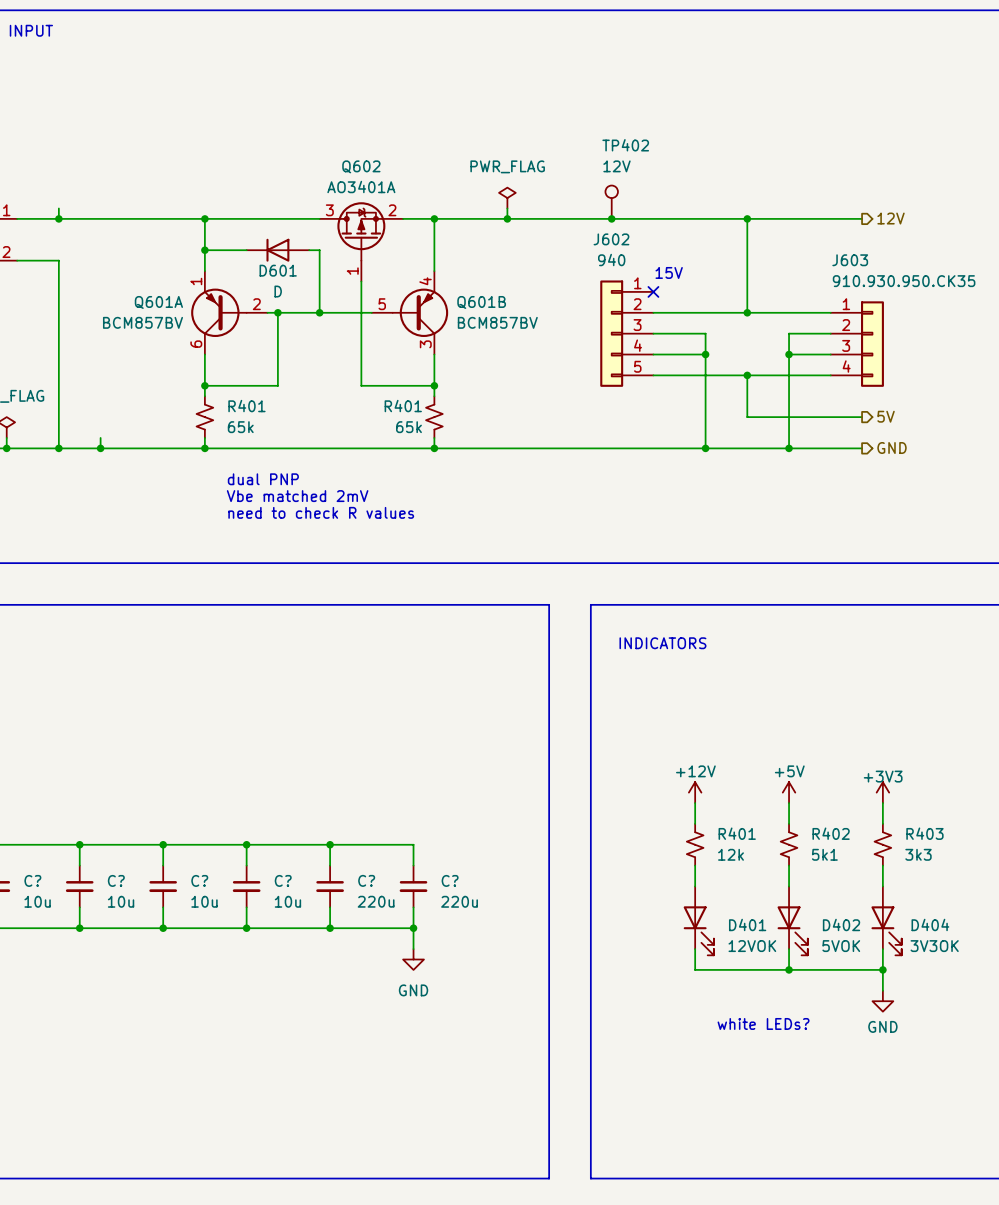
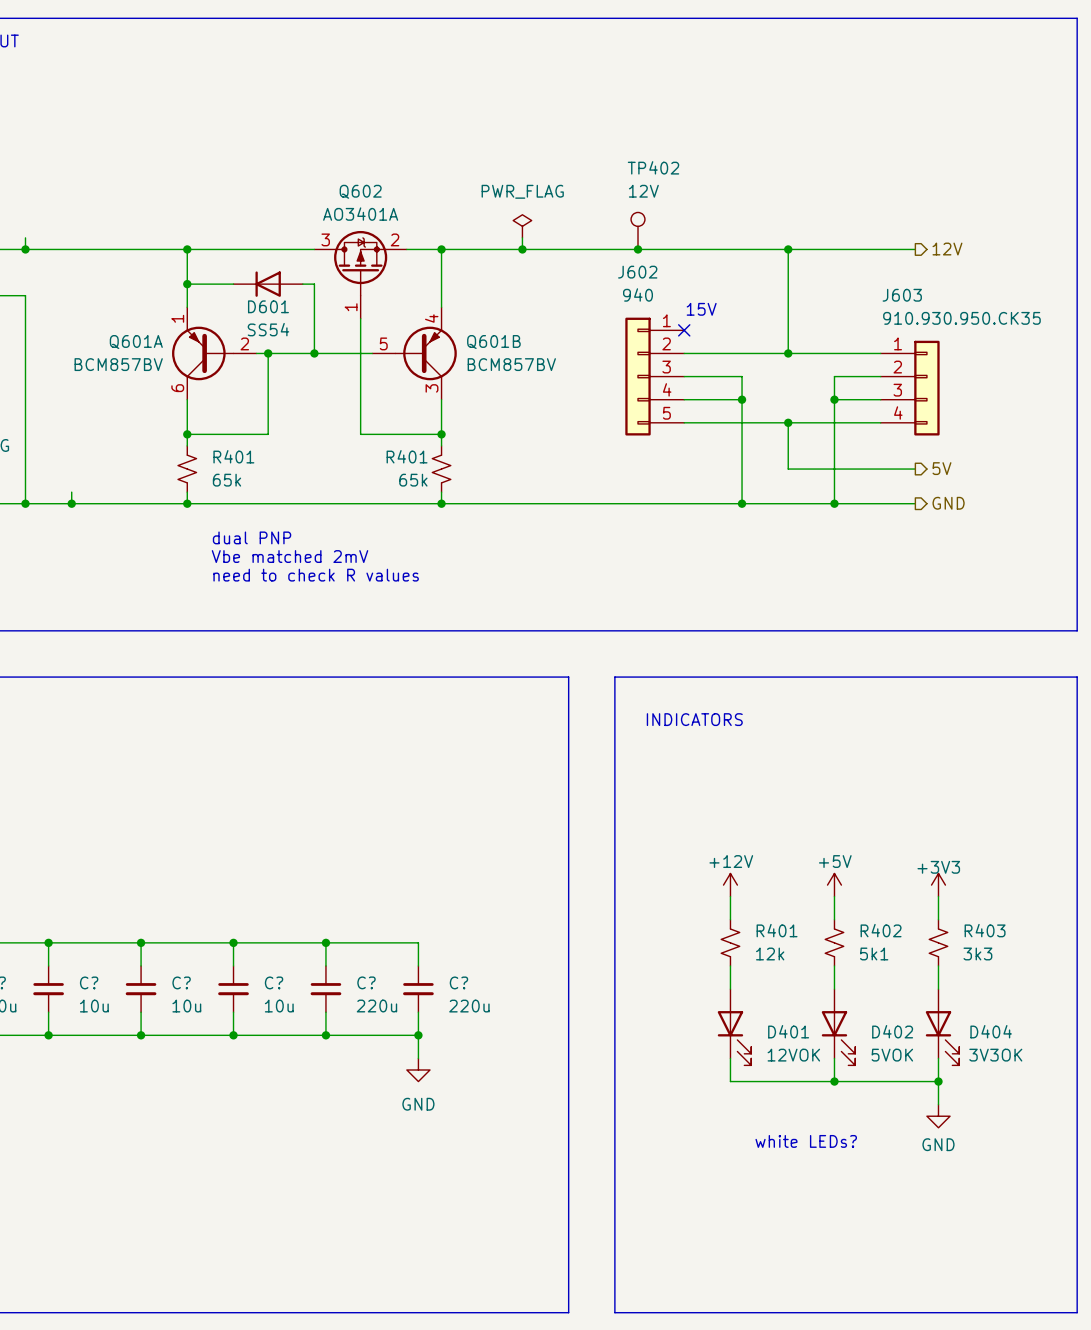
D601 value: D (278, 291) -> SS54 (268, 329)

